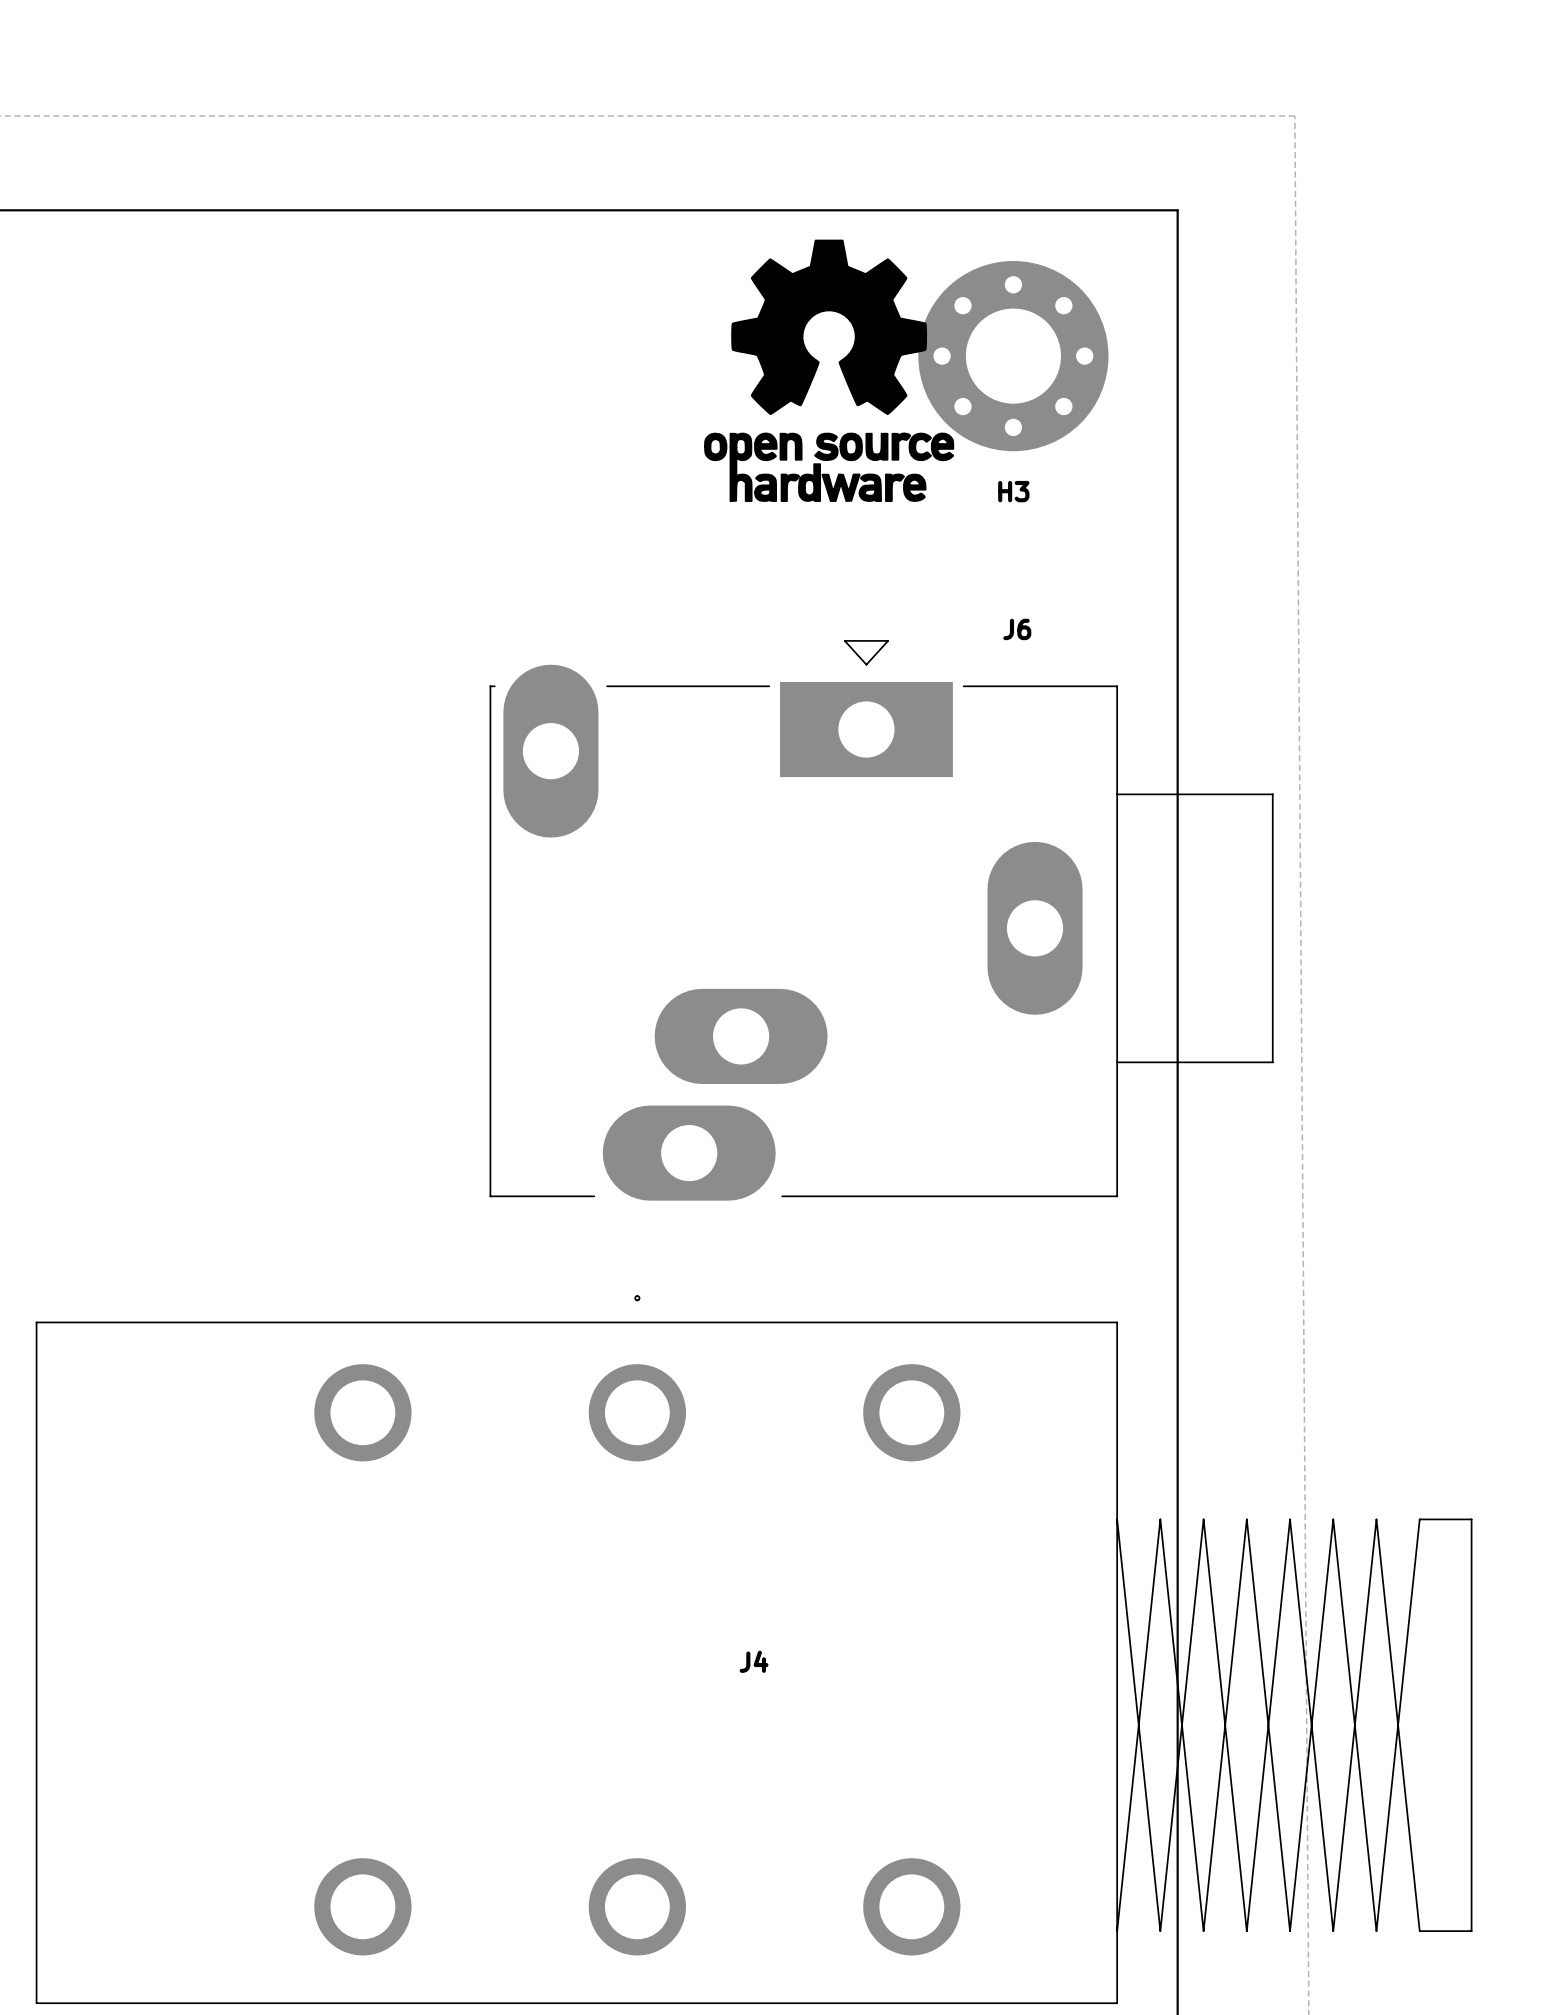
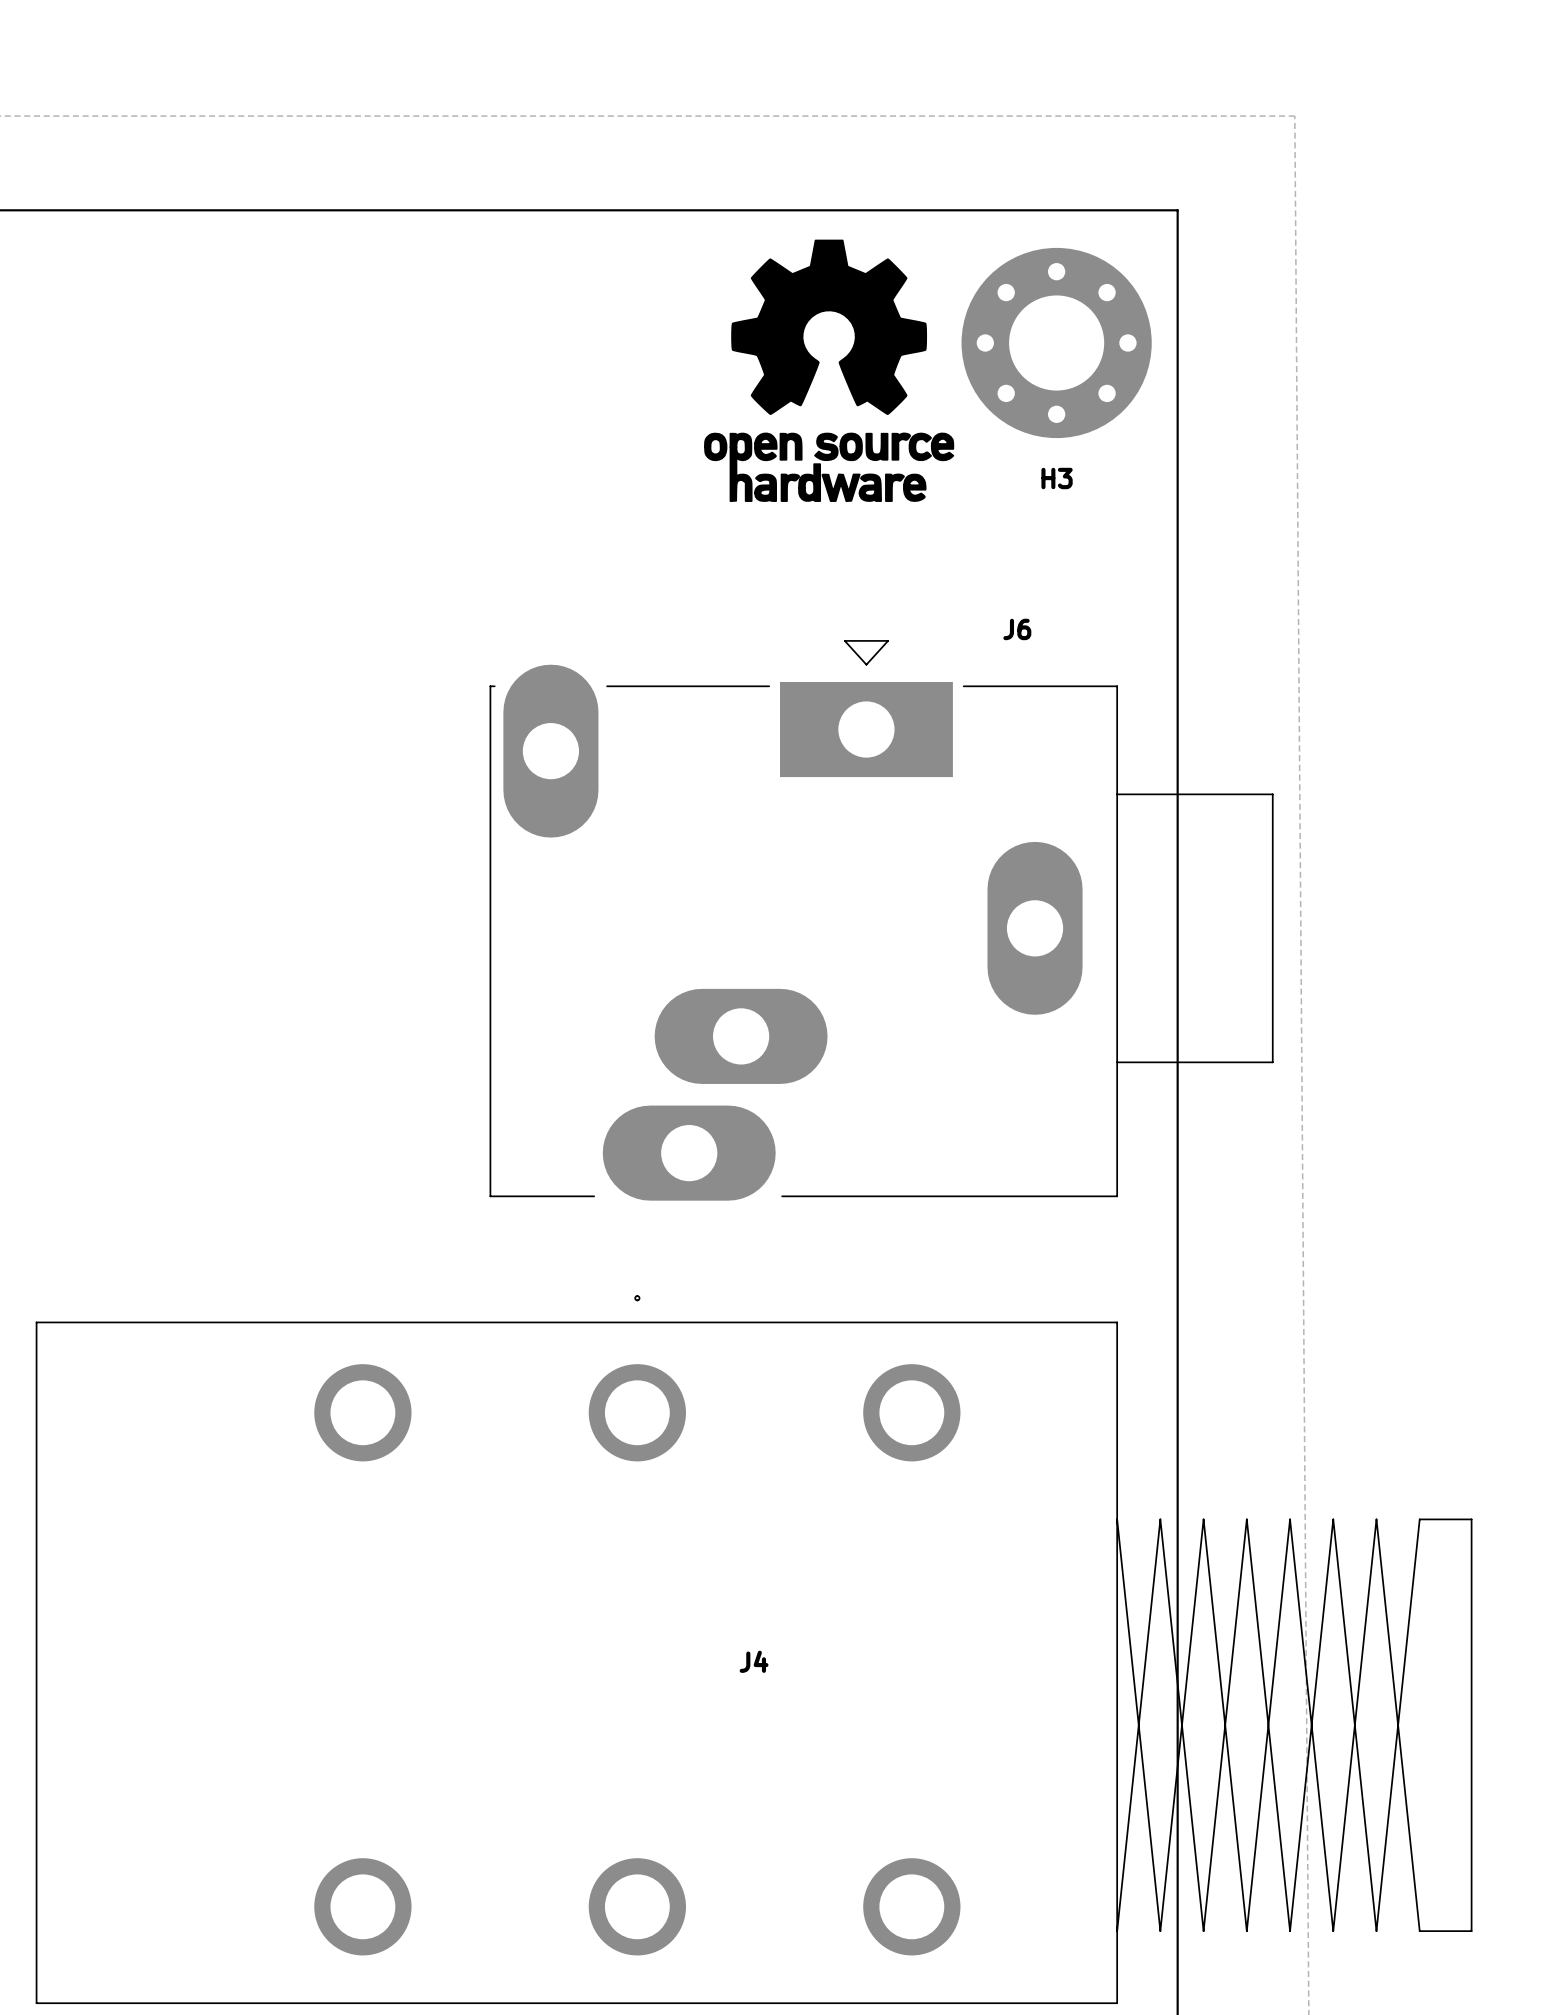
H3 position: (1013, 356) -> (1056, 343)

